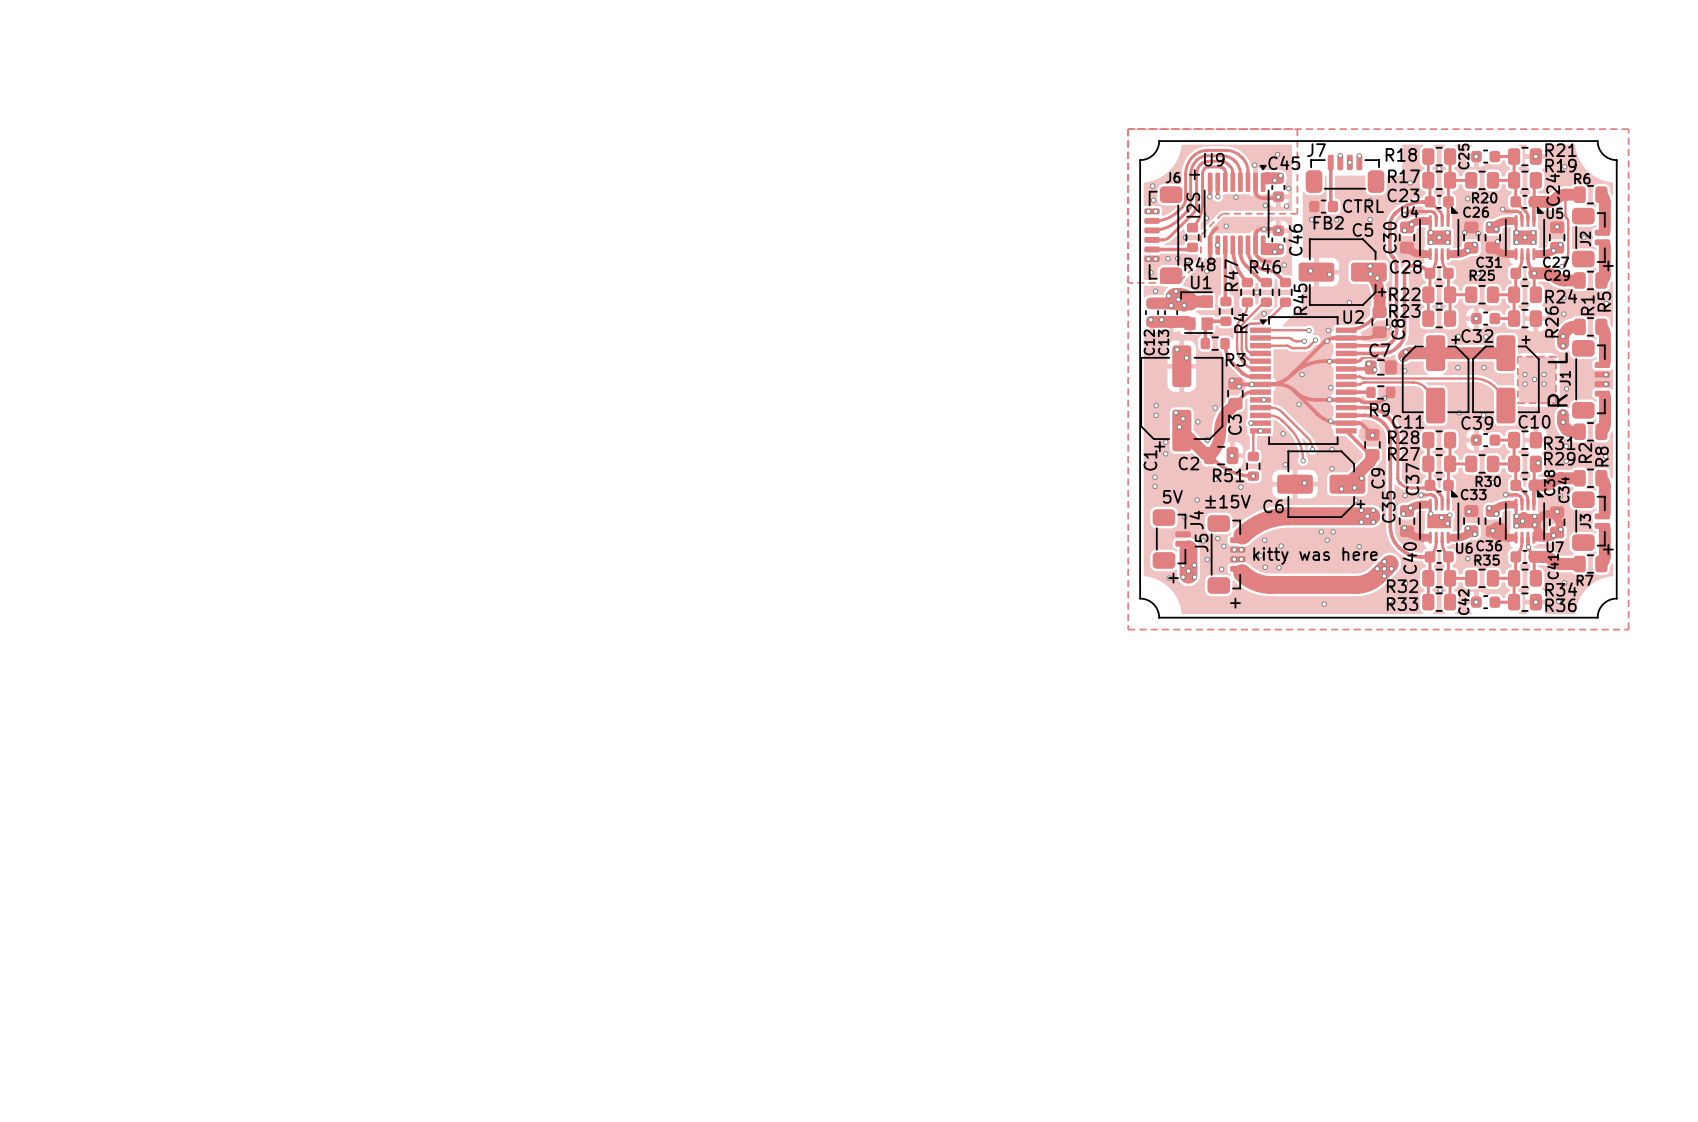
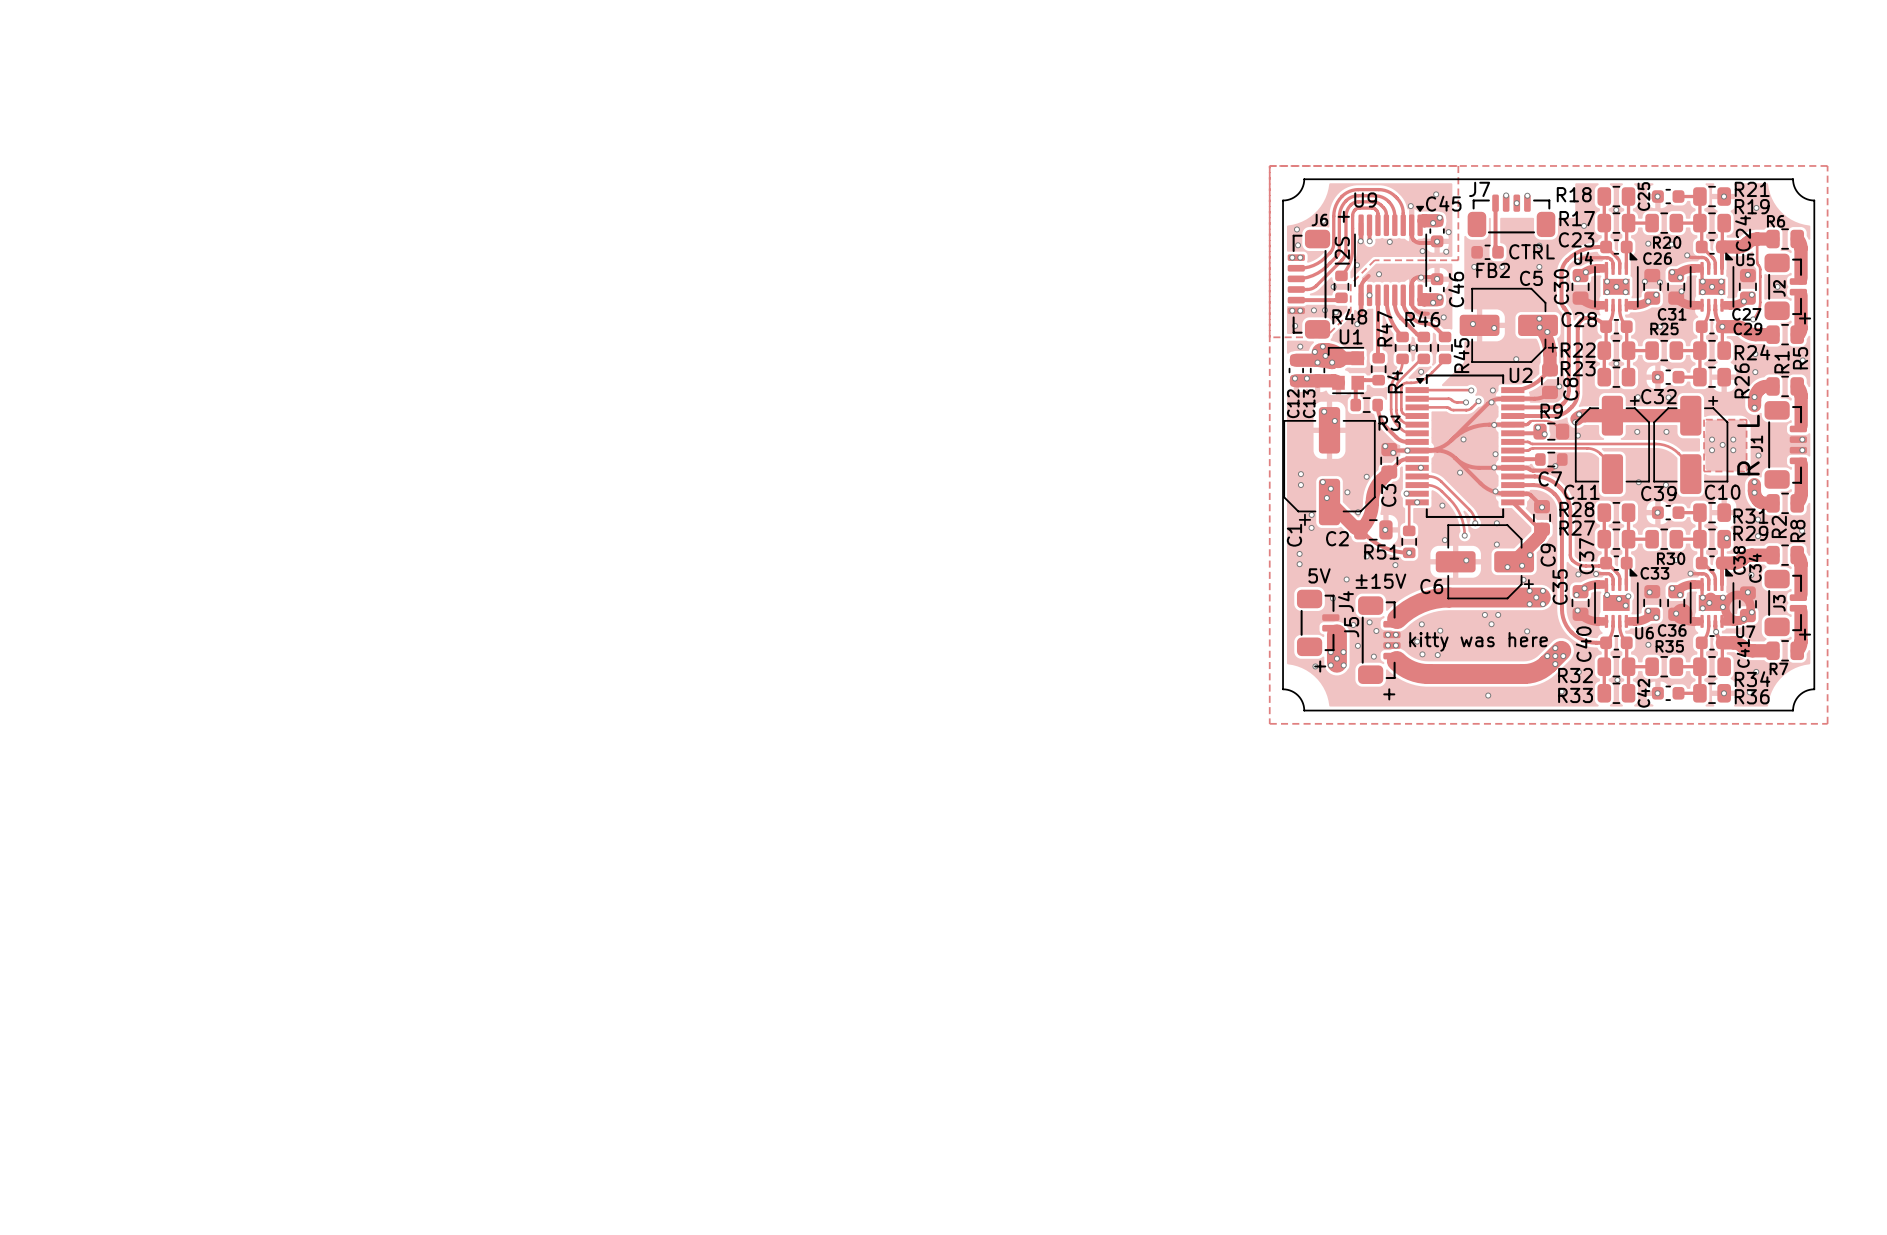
C7 name position: C7 (1379, 350) -> C7 (1550, 478)
R9 name position: R9 (1379, 409) -> R9 (1551, 411)

